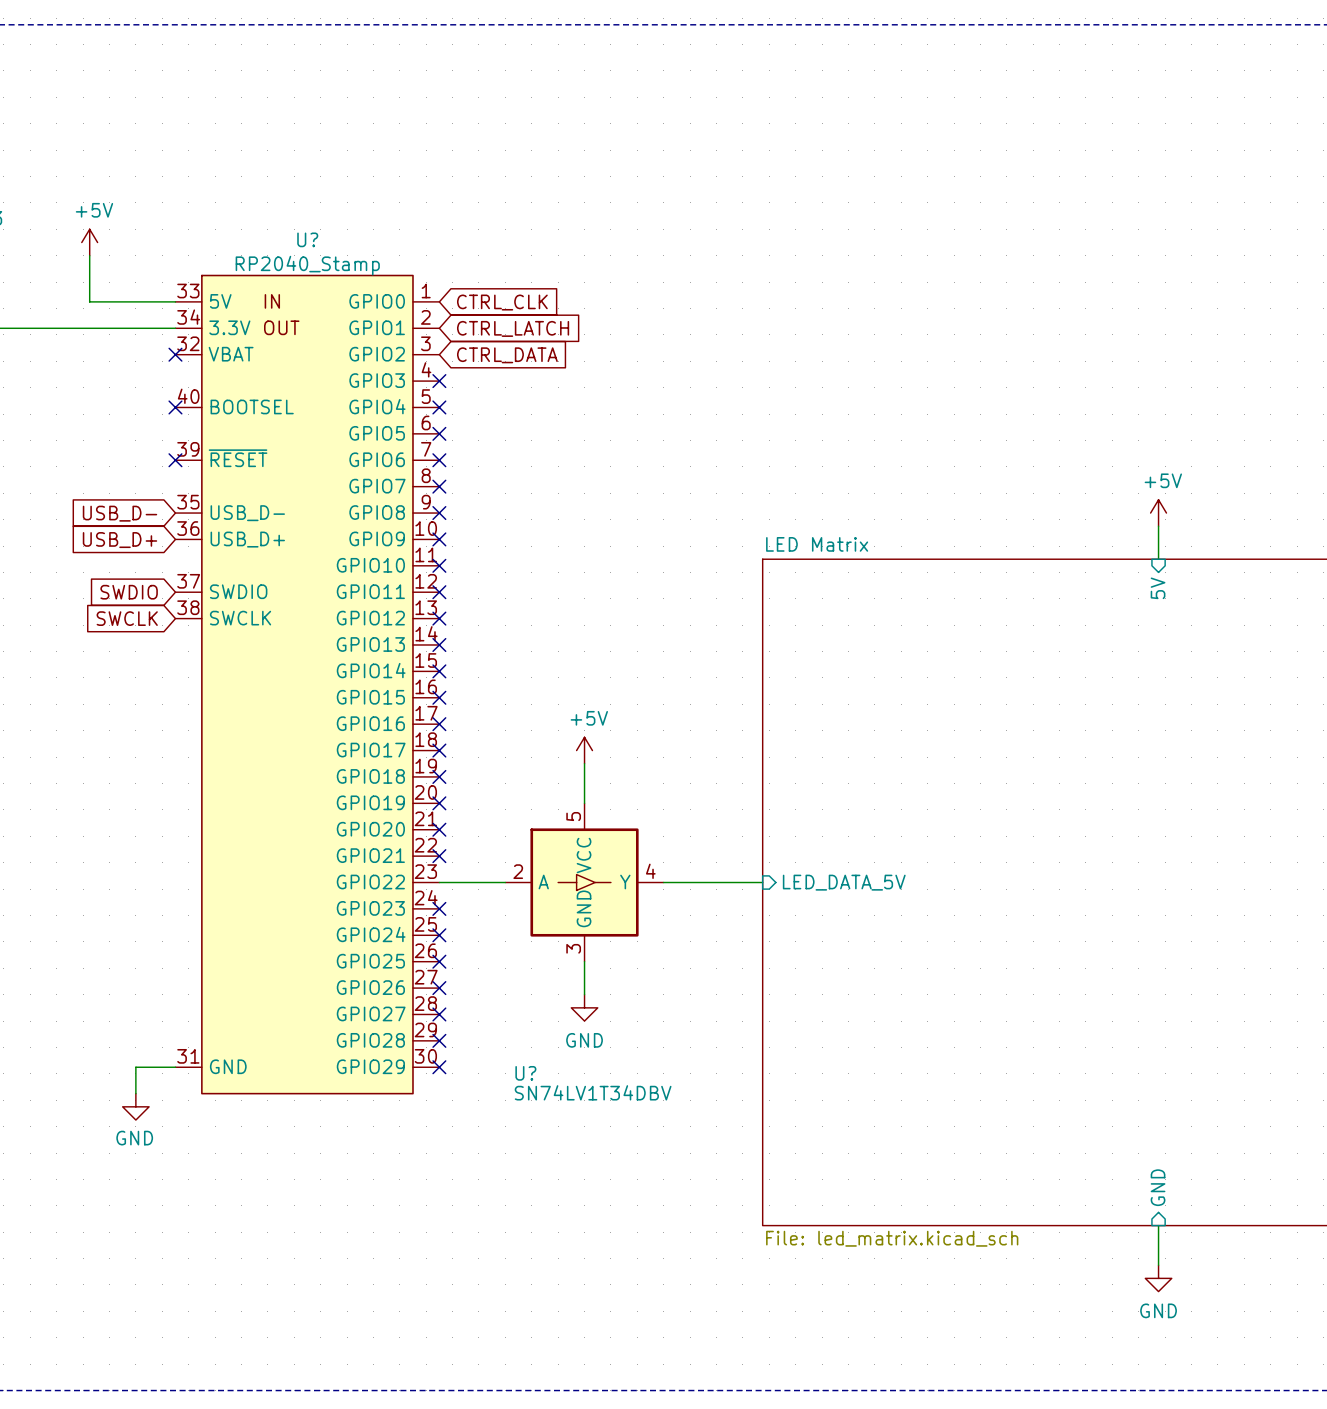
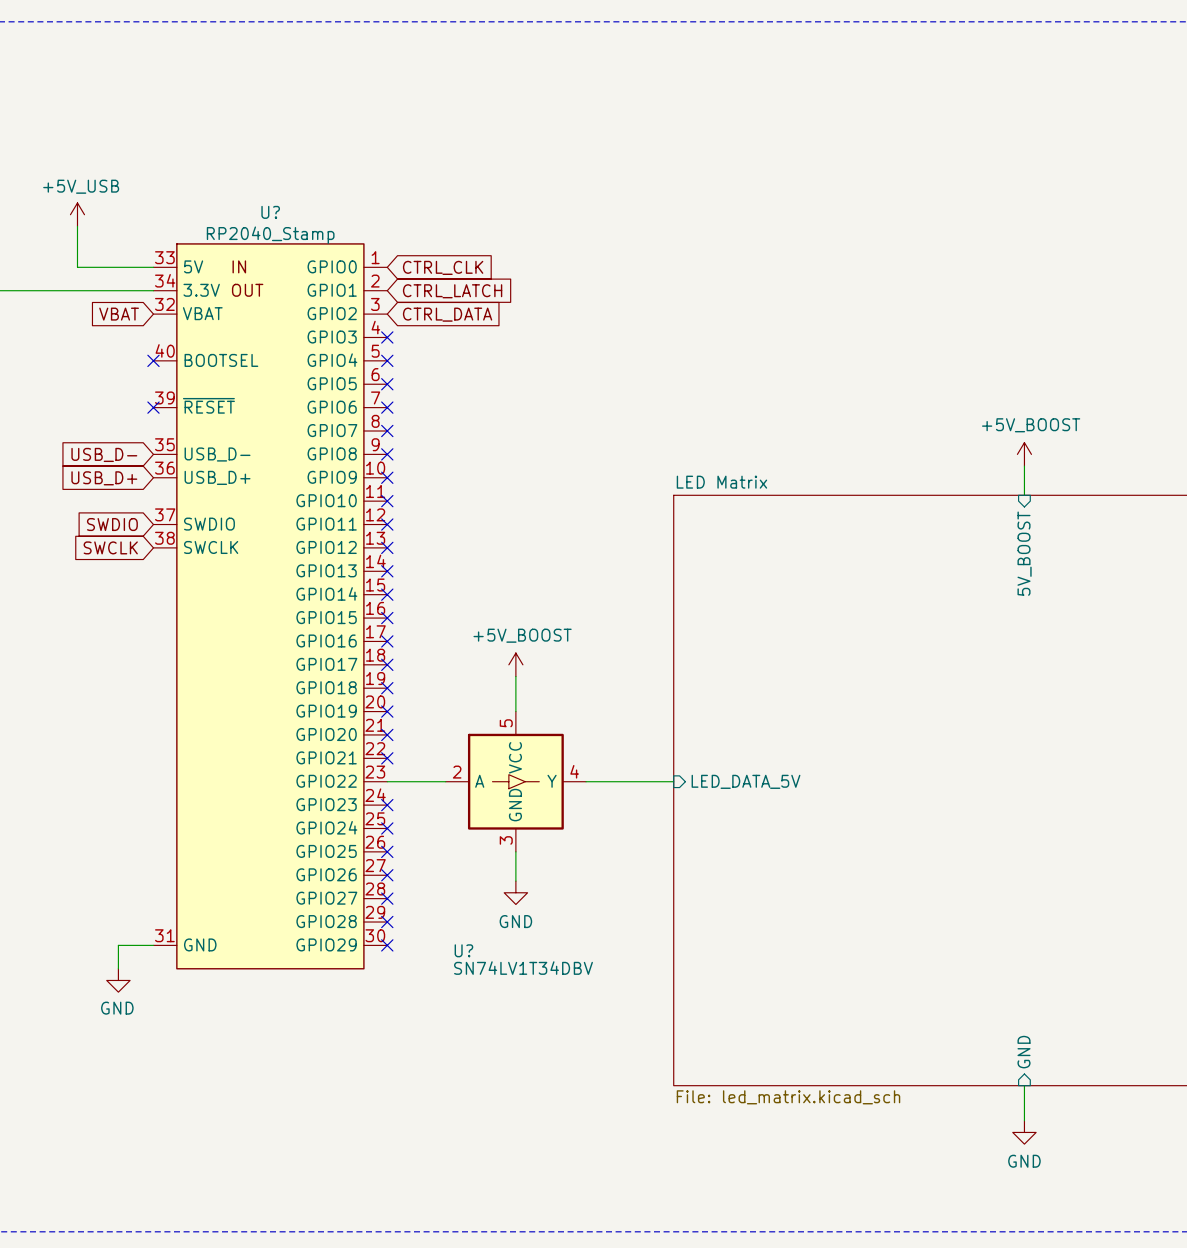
power symbol: +5V (89, 242) -> +5V_USB (77, 214)
global label: none -> VBAT (119, 314)
no-connect mark: (175, 354) -> none
power symbol: +5V (1158, 513) -> +5V_BOOST (1024, 454)
sheet pin: 5V (1158, 588) -> 5V_BOOST (1024, 553)
power symbol: +5V (584, 750) -> +5V_BOOST (515, 664)

